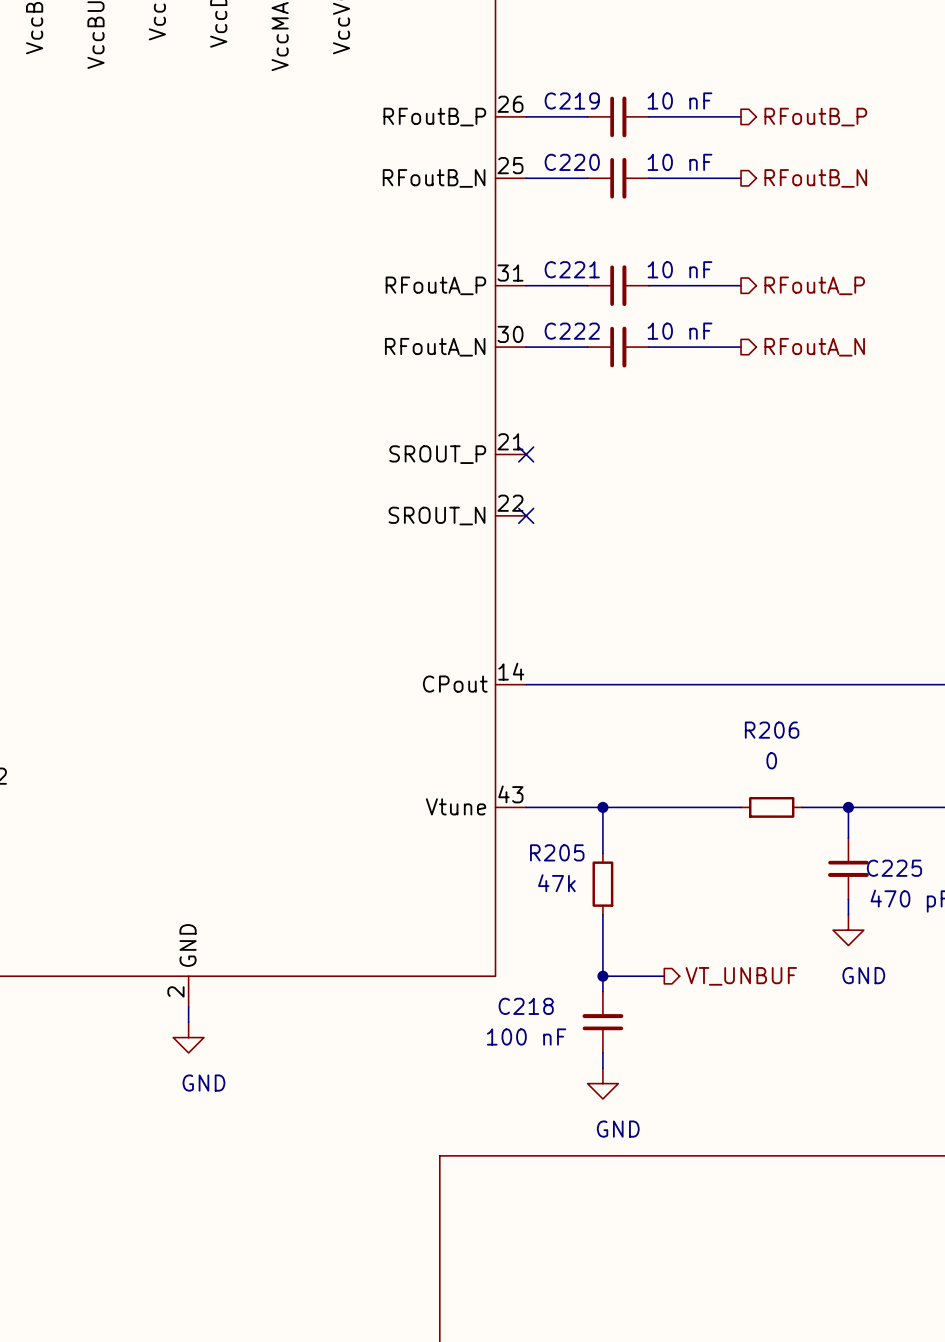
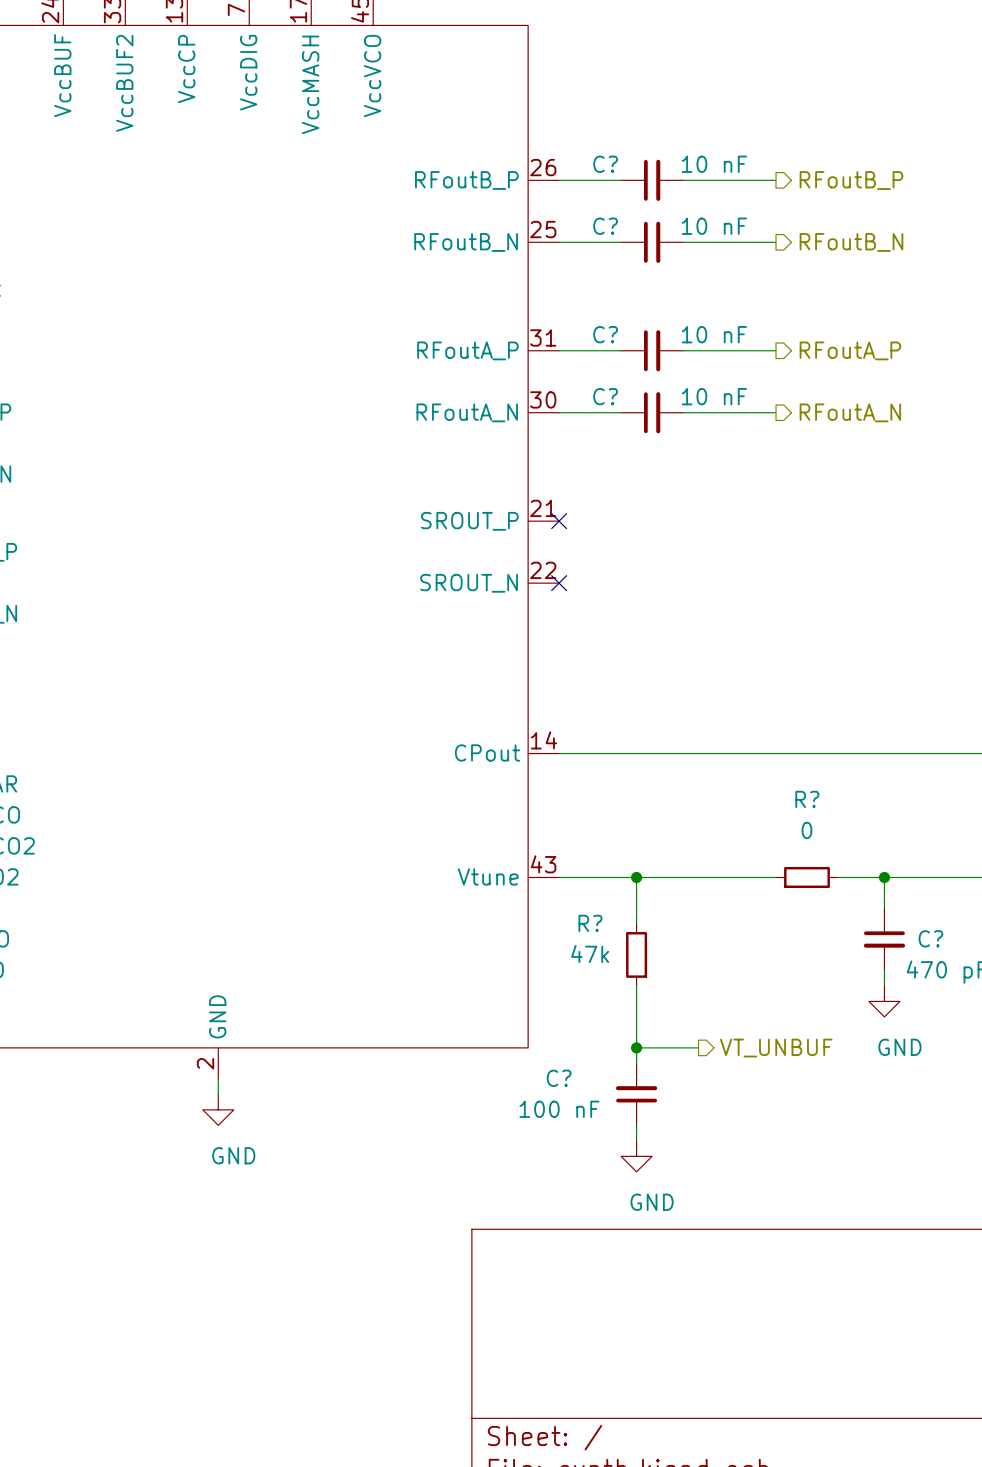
C219 name: C219 (572, 100) -> C? (605, 164)
C220 name: C220 (572, 162) -> C? (605, 226)
C221 name: C221 (572, 269) -> C? (605, 334)
C222 name: C222 (572, 331) -> C? (605, 396)
R206 name: R206 (772, 730) -> R? (807, 799)
R205 name: R205 (557, 852) -> R? (590, 923)
C225 name: C225 (894, 868) -> C? (930, 938)
C218 name: C218 (526, 1006) -> C? (559, 1078)

